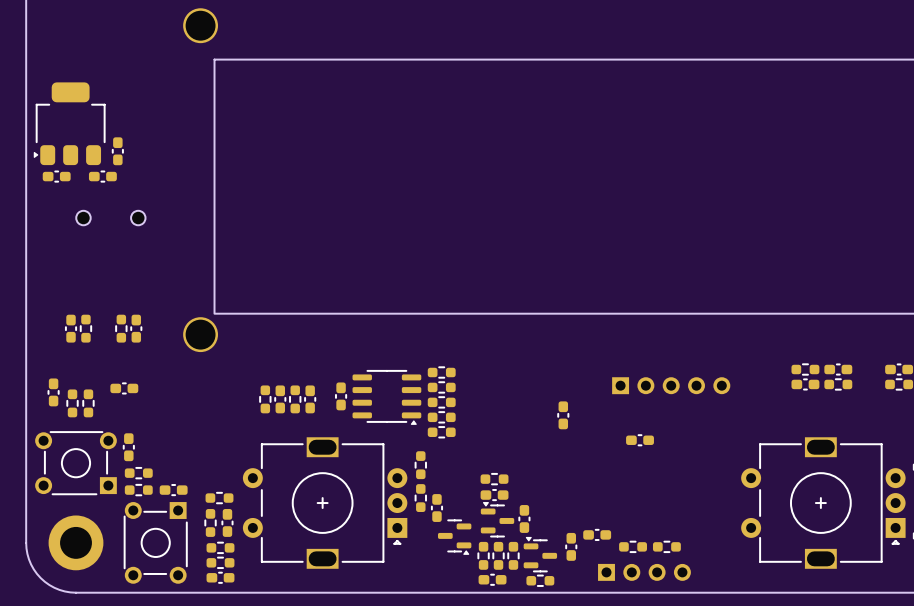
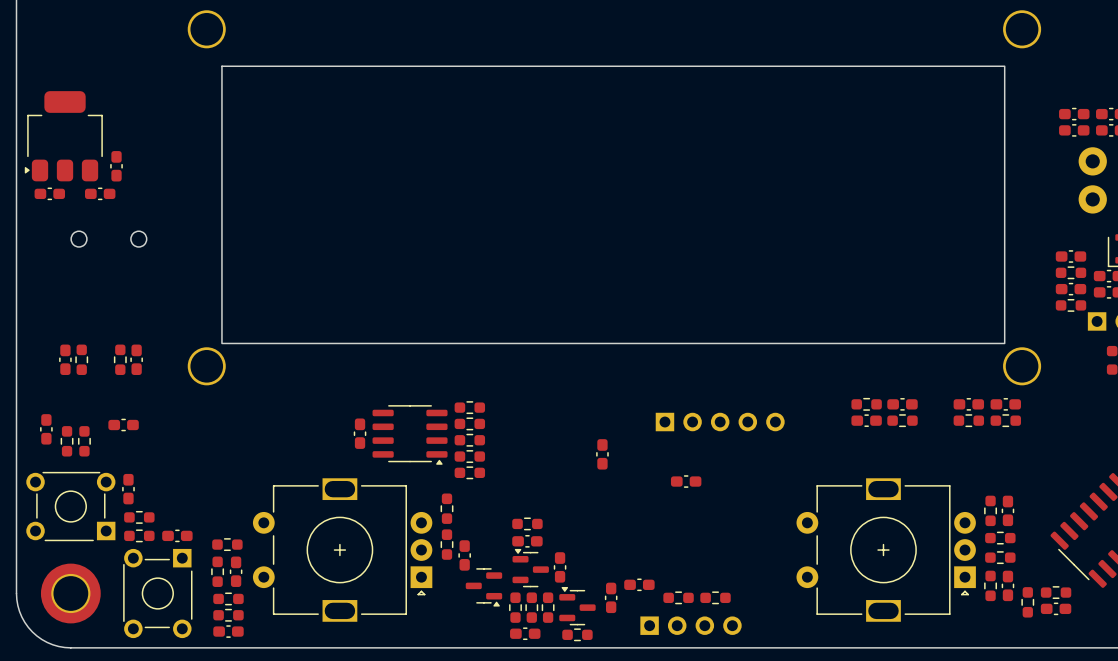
part: (265, 399) -> none
part: (280, 399) -> none
part: (295, 399) -> none
part: (310, 399) -> none

